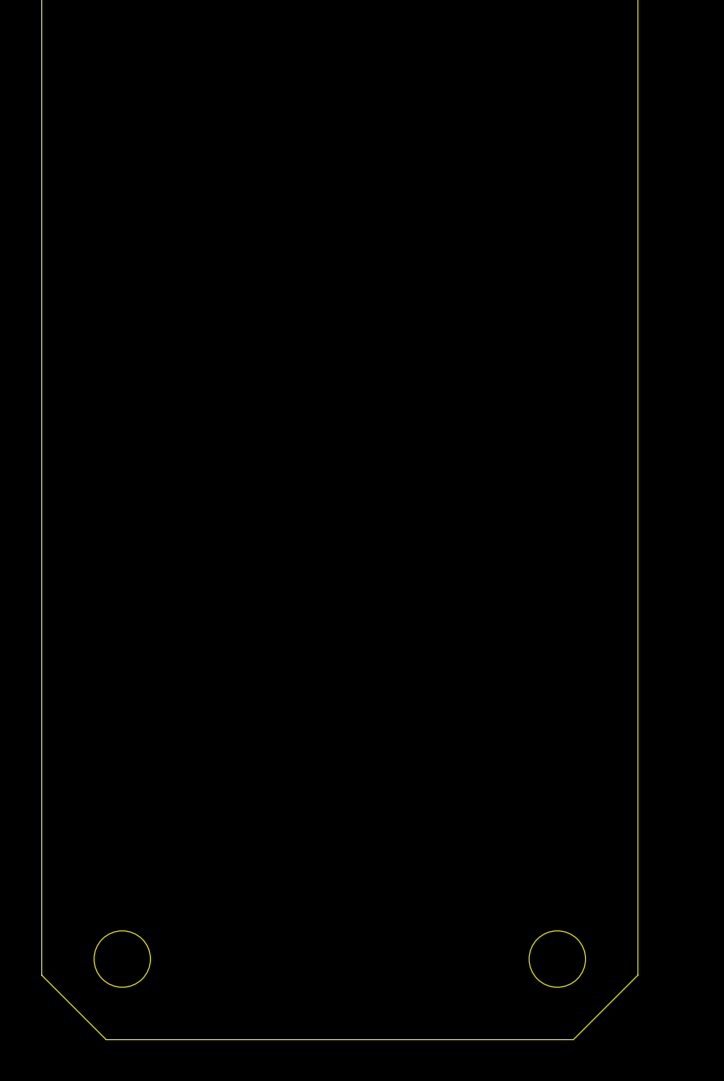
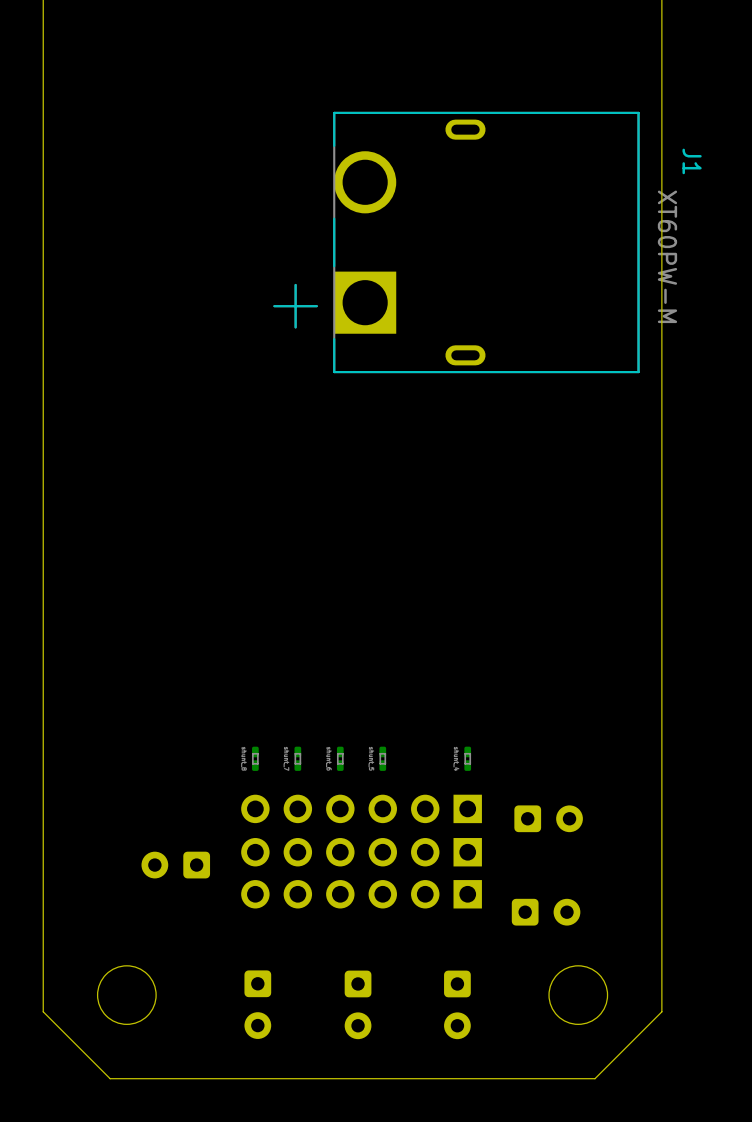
J1: none -> XT60PW-M (456, 242)
part: none -> (255, 758)
part: none -> (297, 758)
part: none -> (340, 758)
part: none -> (382, 758)
part: none -> (467, 758)
part: none -> (361, 808)
part: none -> (548, 818)
part: none -> (361, 852)
part: none -> (175, 865)
part: none -> (361, 894)
part: none -> (546, 912)
part: none -> (257, 1004)
part: none -> (358, 1004)
part: none -> (457, 1004)

